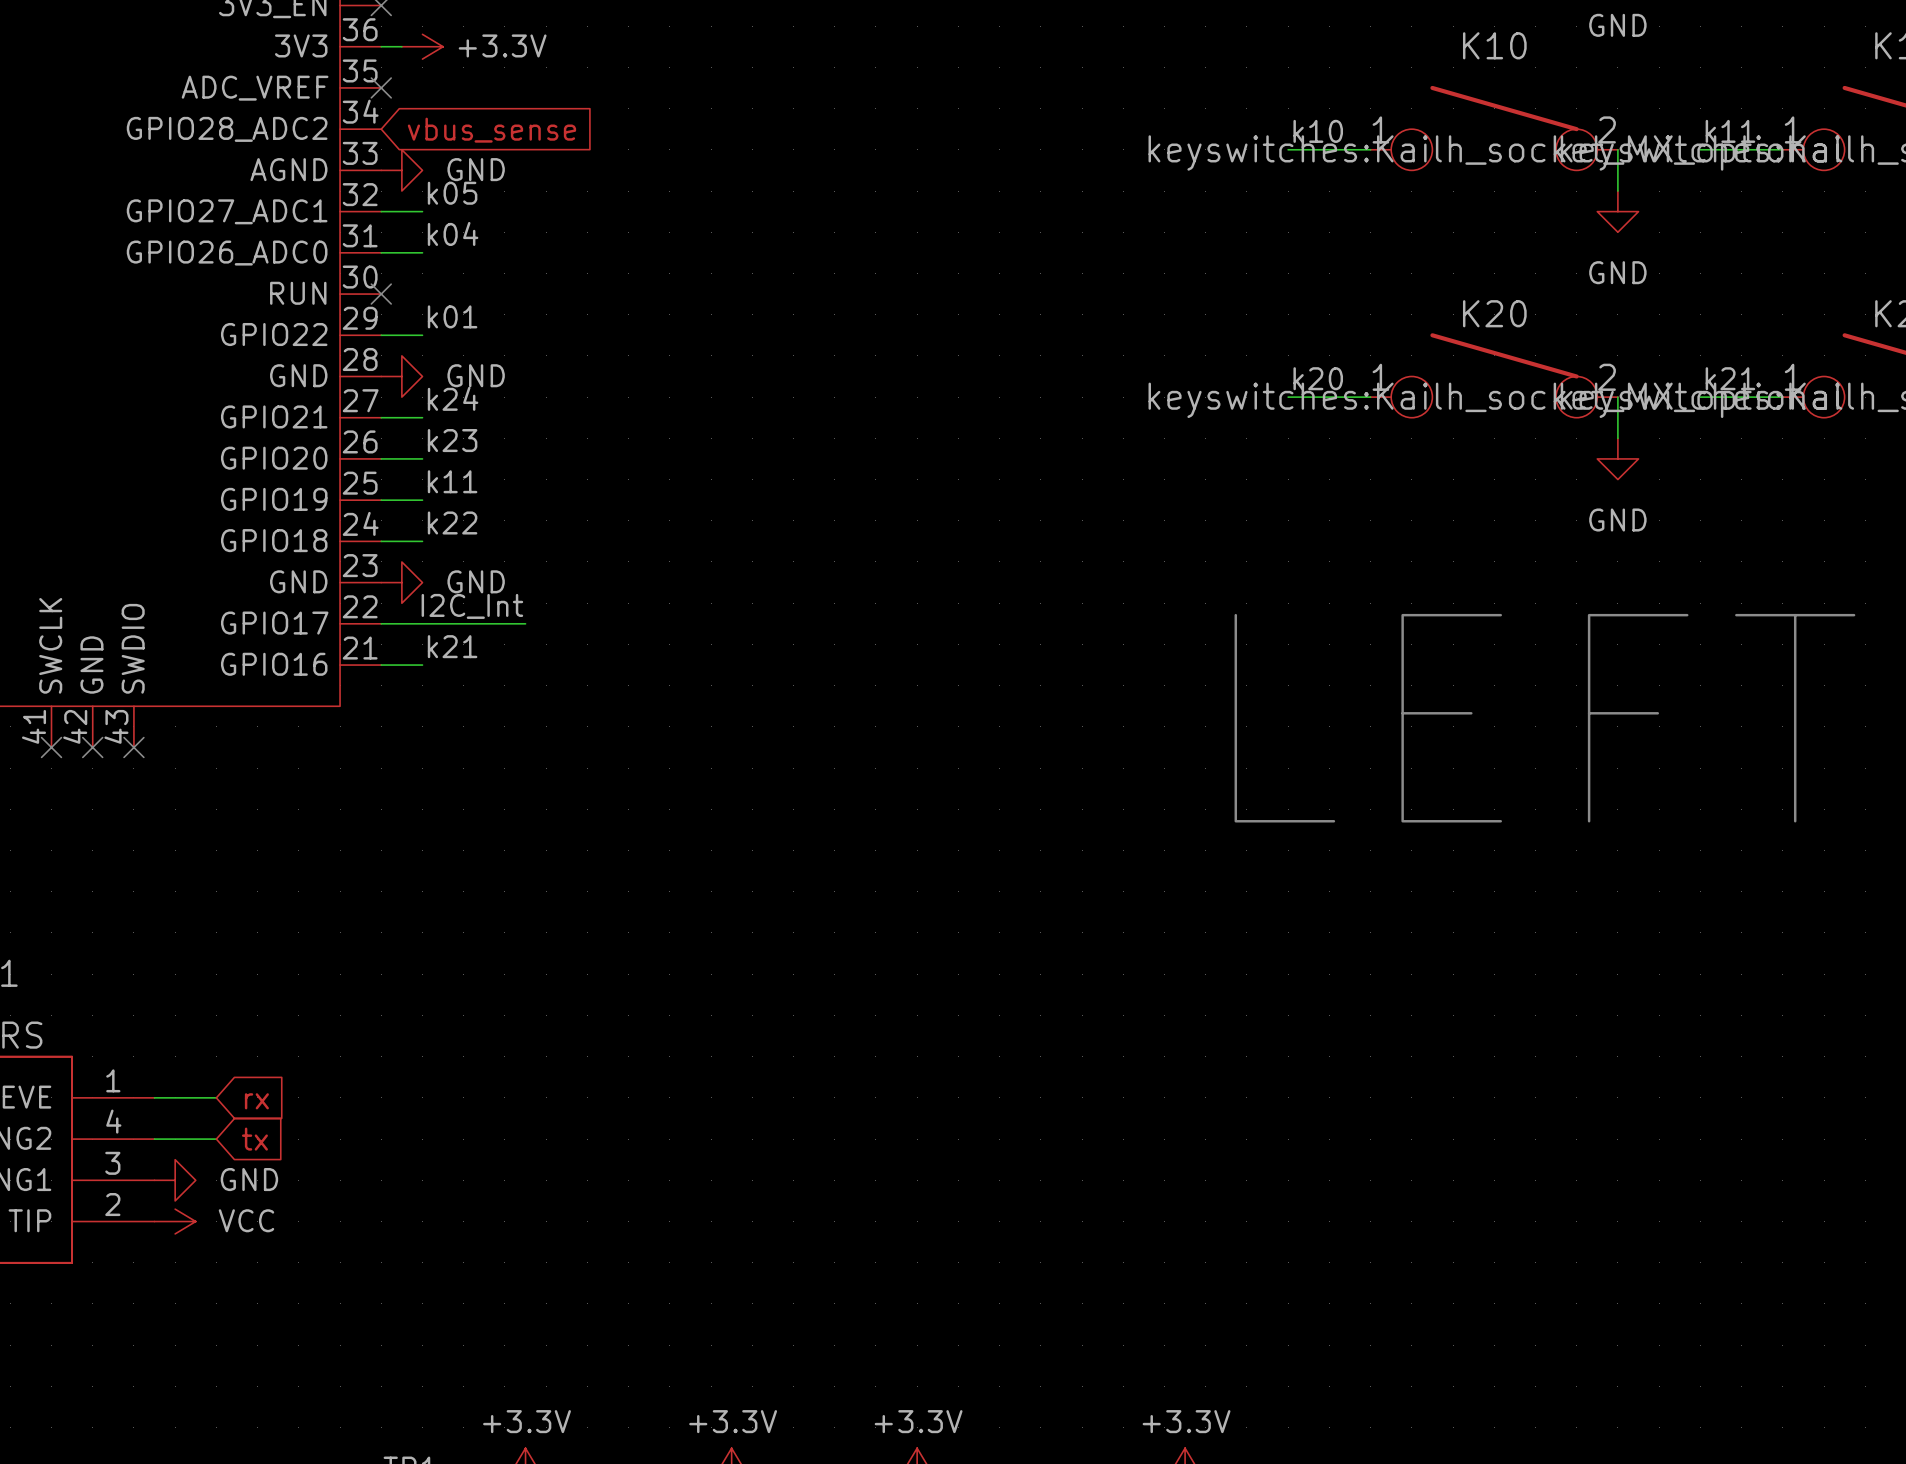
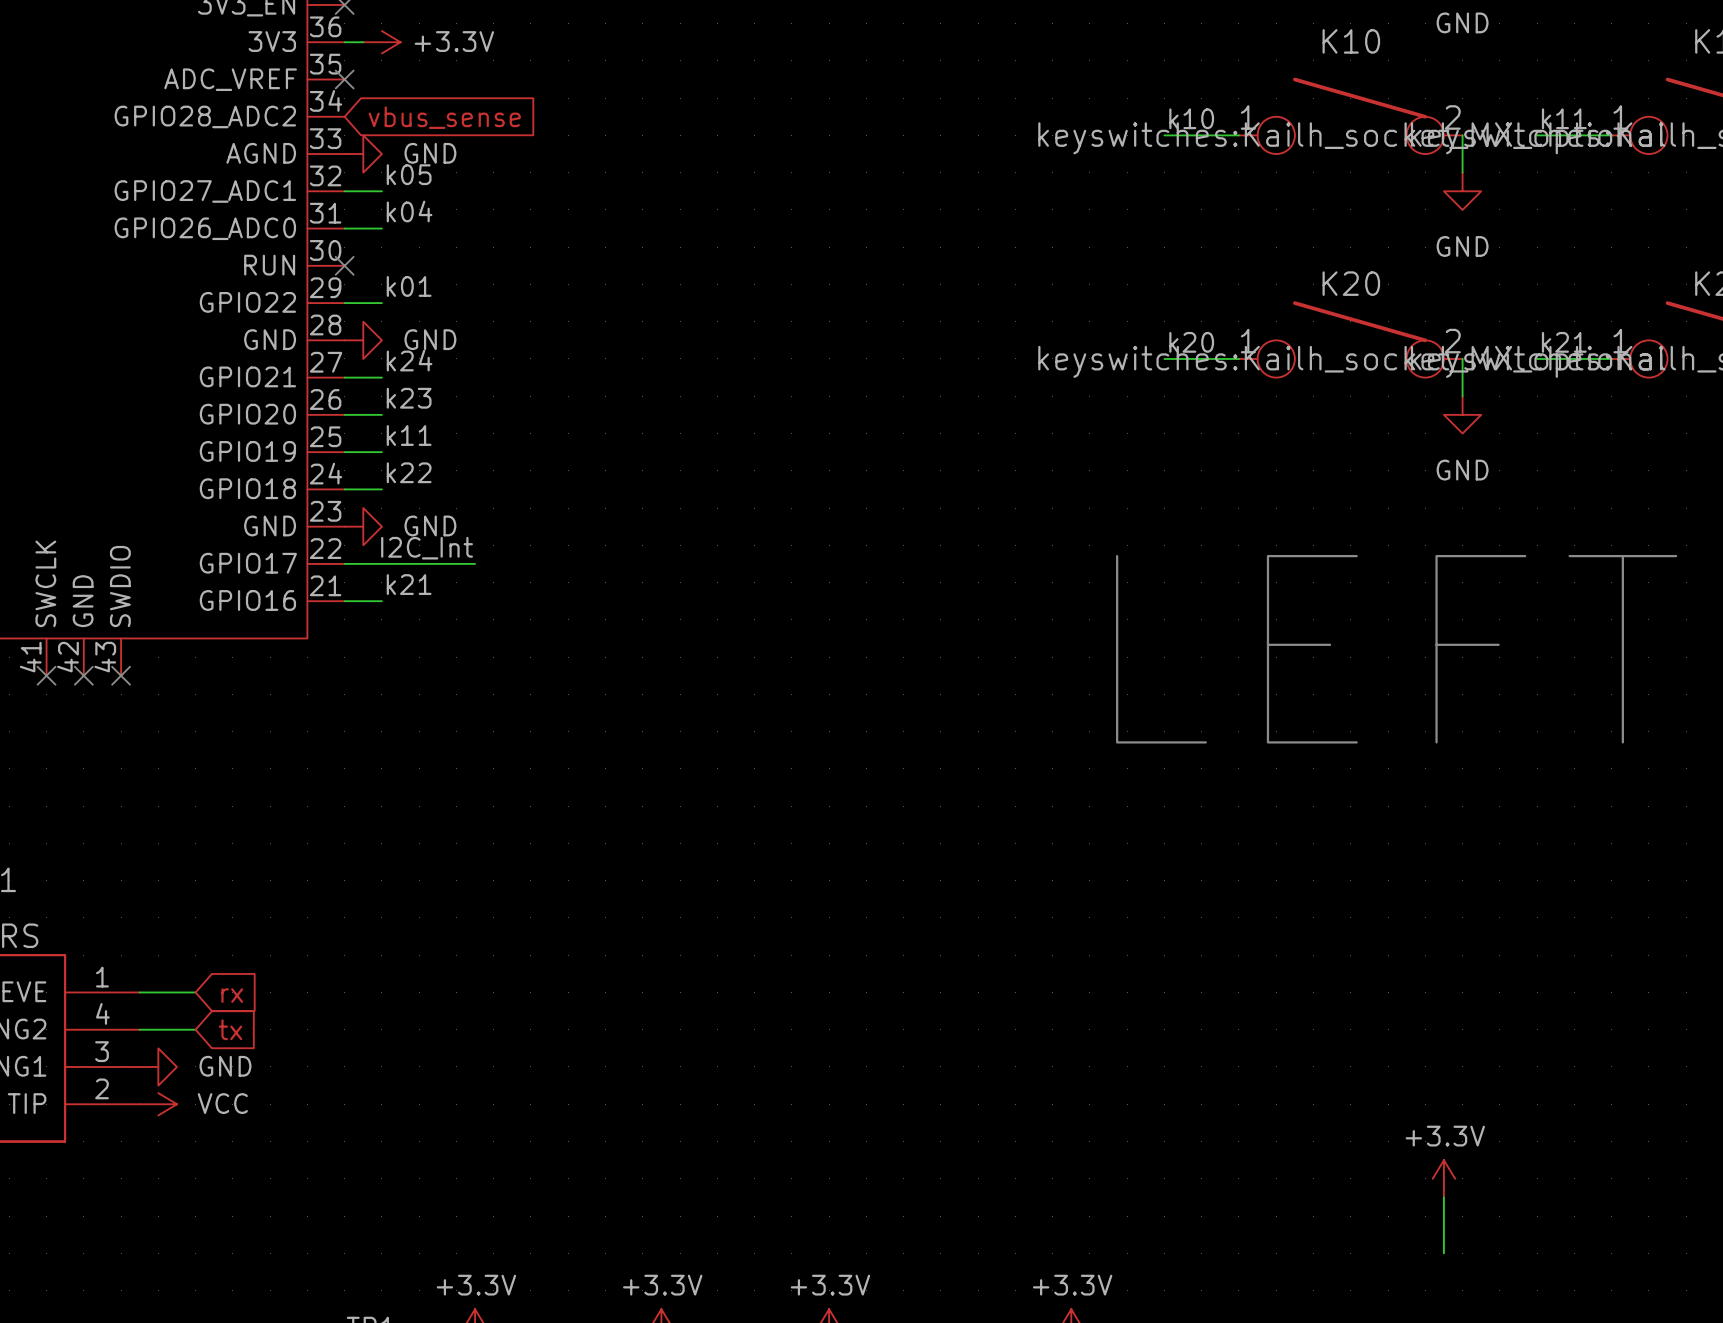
power symbol: none -> +3.3V (1443, 1178)
wire: none -> (1443, 1197) (1443, 1253)

